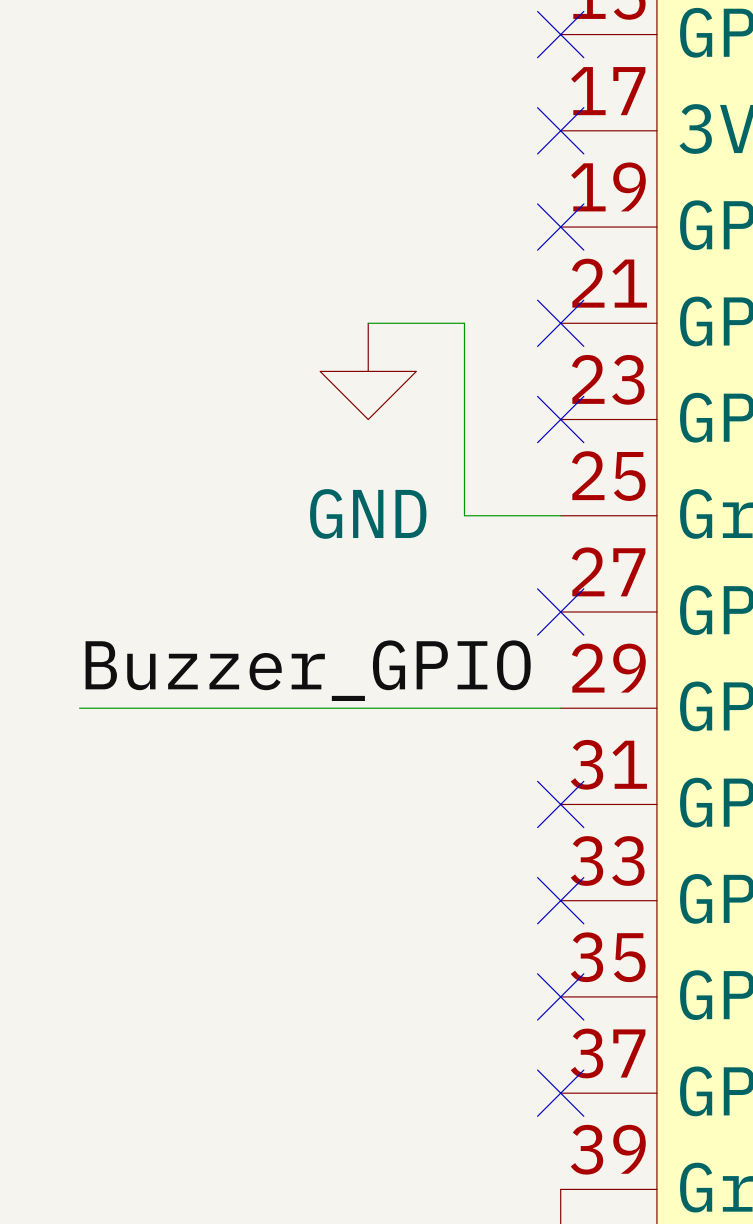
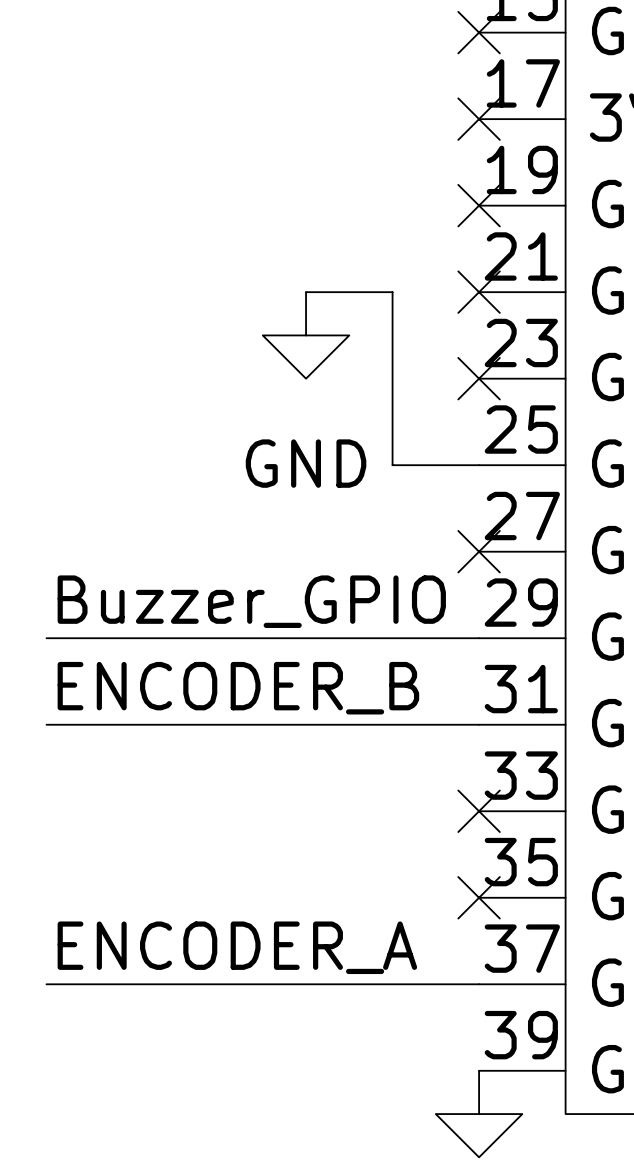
label: none -> ENCODER_B (238, 688)
wire: none -> (46, 724) (479, 724)
no-connect mark: (560, 804) -> none
label: none -> ENCODER_A (237, 947)
wire: none -> (46, 984) (479, 984)
no-connect mark: (560, 1093) -> none

